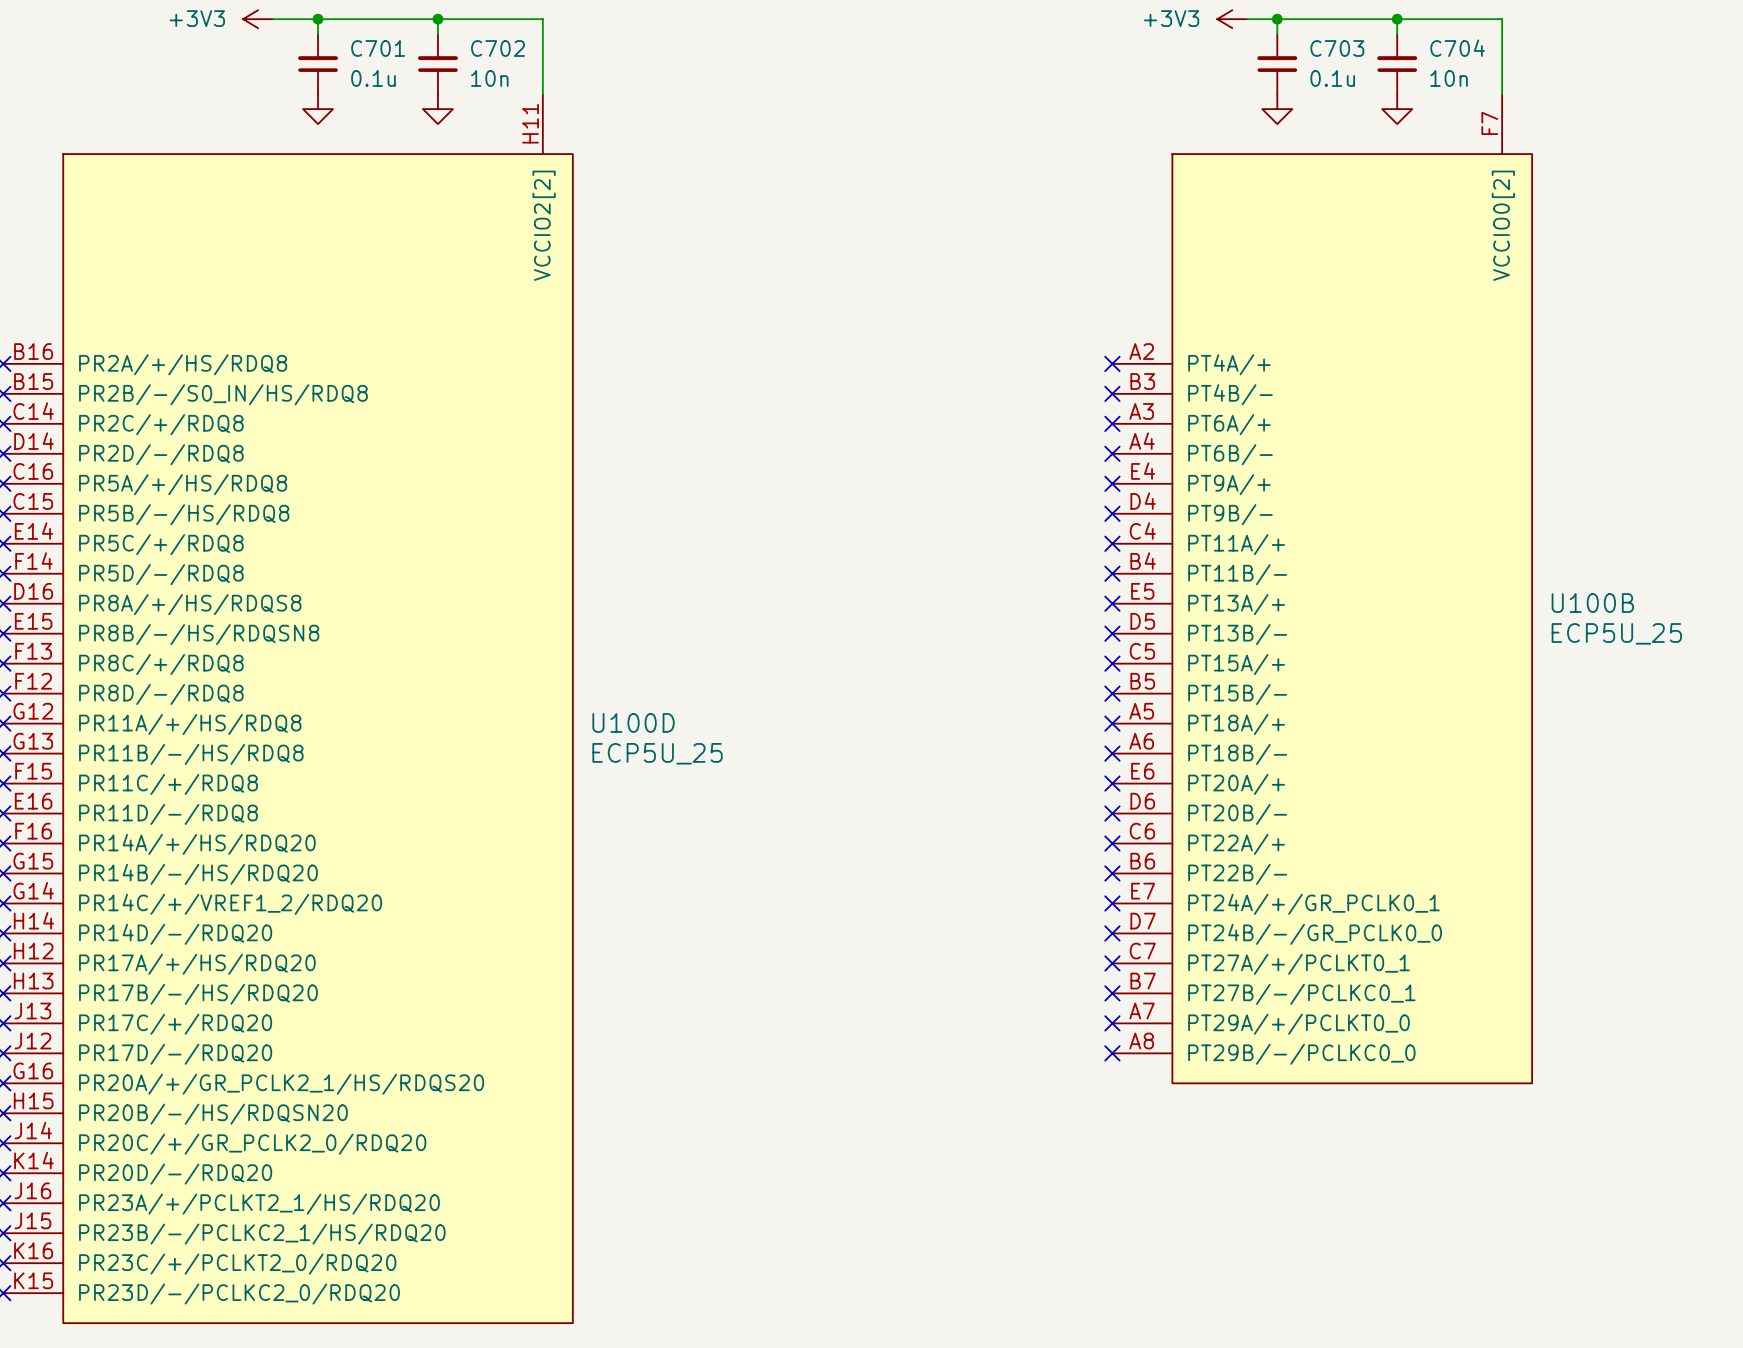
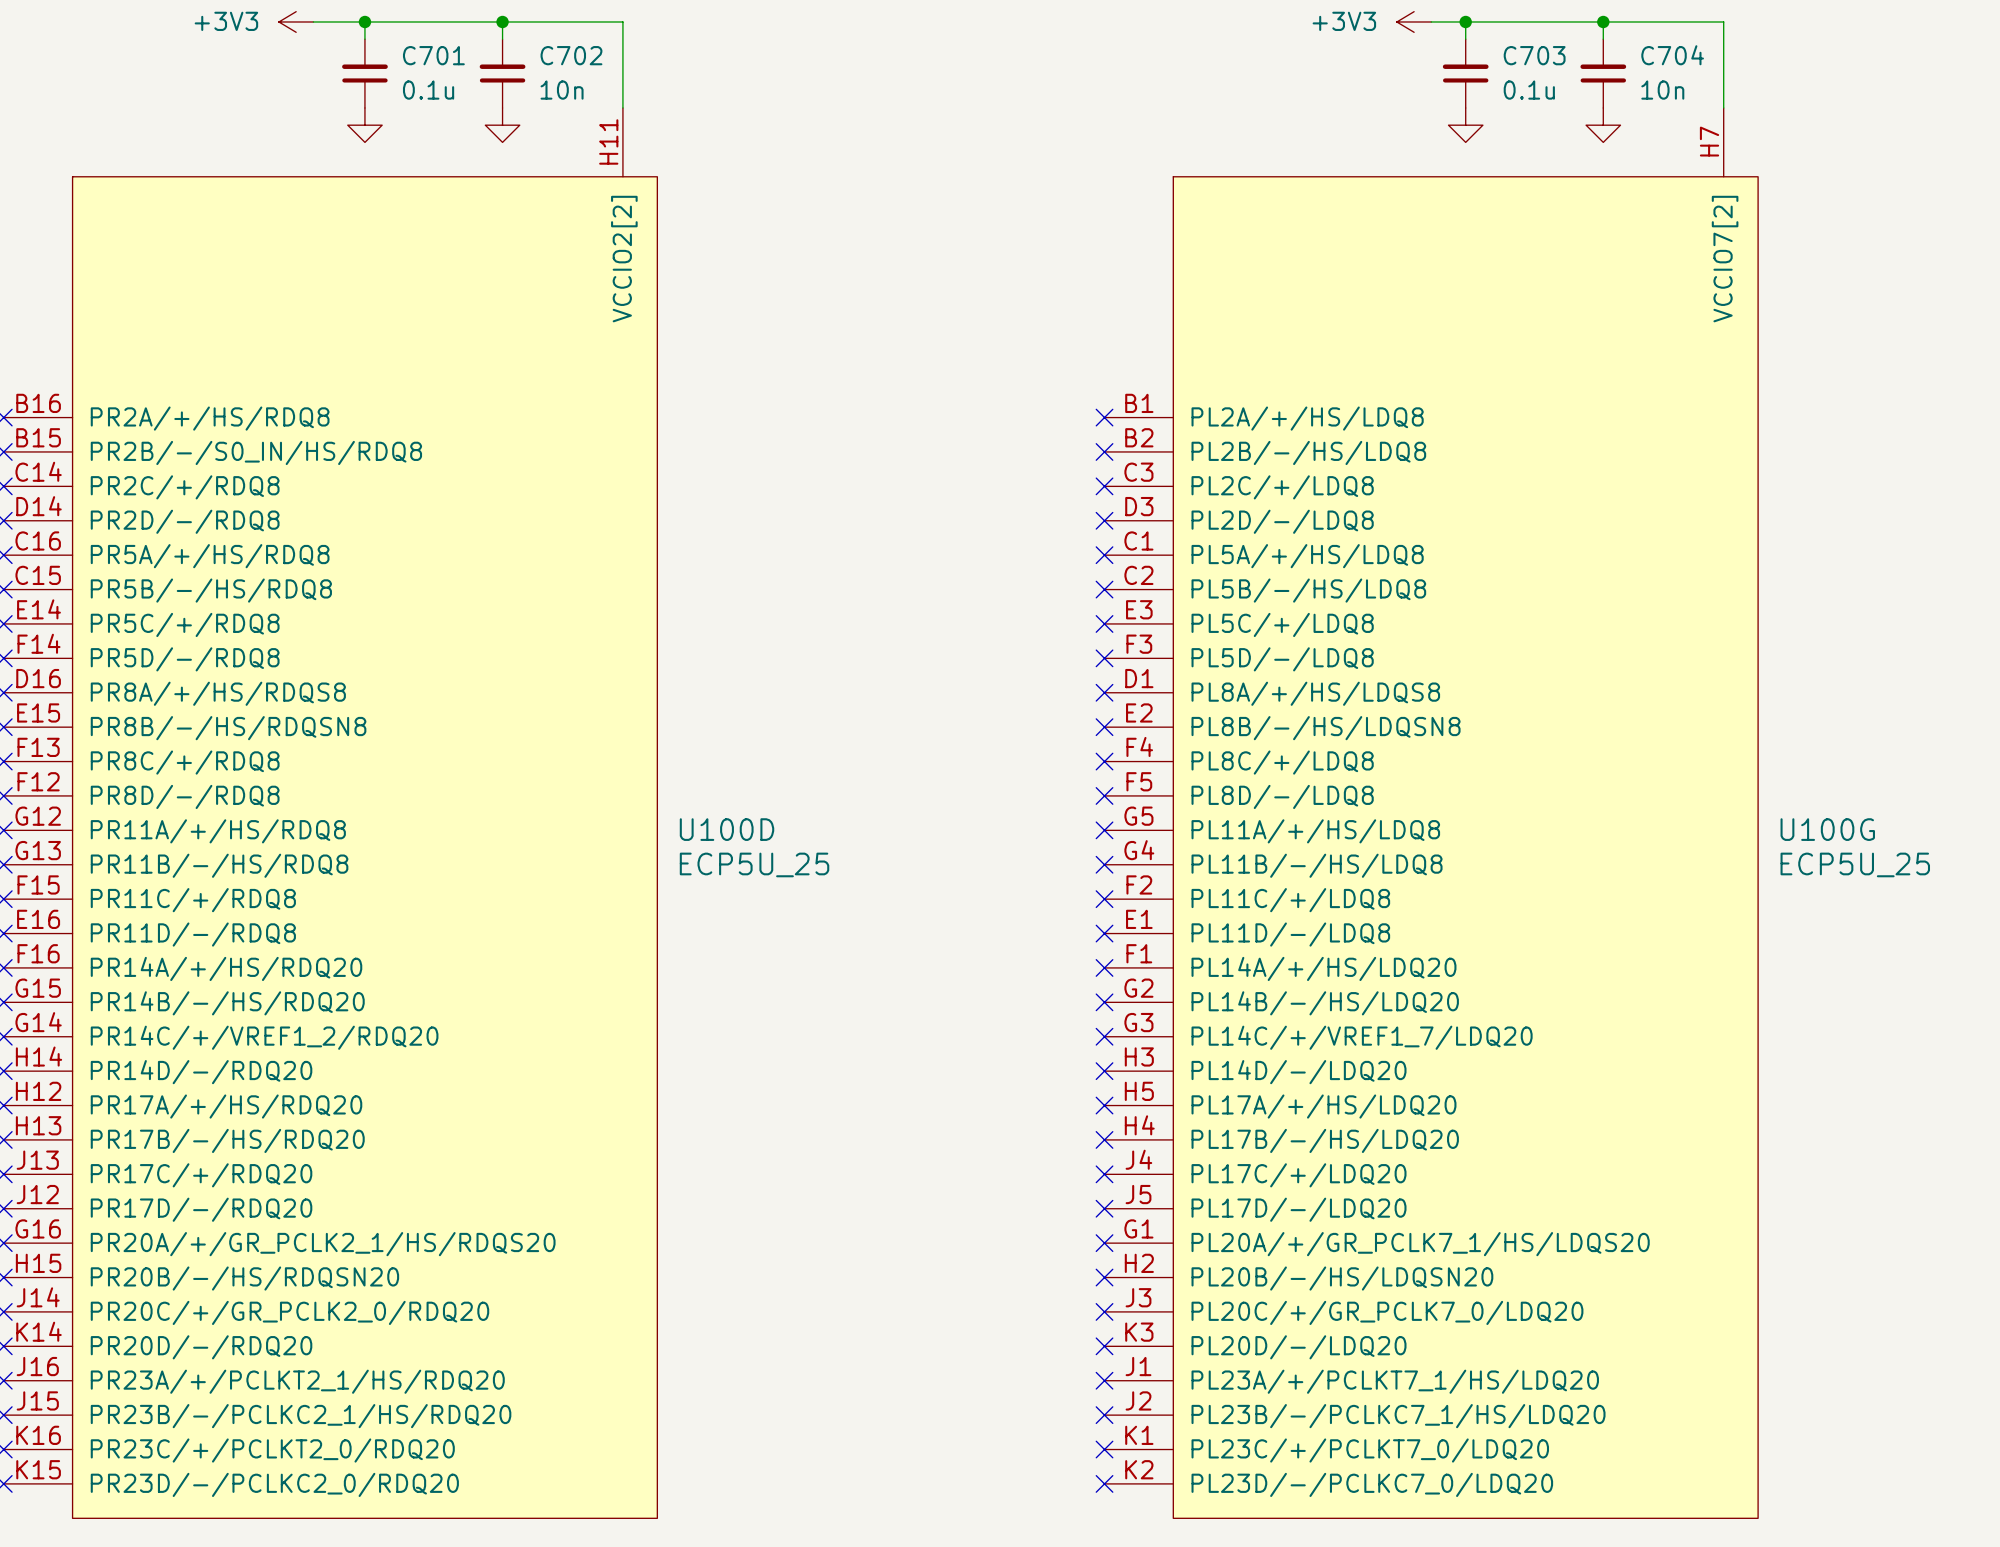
no-connect mark: none -> (1104, 417)
no-connect mark: (1112, 363) -> none
no-connect mark: none -> (1104, 451)
no-connect mark: (1112, 393) -> none
no-connect mark: none -> (1104, 486)
no-connect mark: (1112, 423) -> none
no-connect mark: none -> (1104, 520)
no-connect mark: (1112, 453) -> none
no-connect mark: none -> (1104, 555)
no-connect mark: (1112, 483) -> none
no-connect mark: none -> (1104, 589)
no-connect mark: (1112, 513) -> none
no-connect mark: none -> (1104, 623)
no-connect mark: (1112, 543) -> none
no-connect mark: none -> (1104, 658)
no-connect mark: (1112, 573) -> none
U100B: ECP5U_25 (1322, 588) -> none
no-connect mark: none -> (1104, 692)
no-connect mark: (1112, 603) -> none
no-connect mark: none -> (1104, 727)
no-connect mark: (1112, 633) -> none
no-connect mark: none -> (1104, 761)
no-connect mark: (1112, 663) -> none
no-connect mark: none -> (1104, 795)
no-connect mark: (1112, 693) -> none
U100G: none -> ECP5U_25 (1431, 813)
no-connect mark: none -> (1104, 830)
no-connect mark: (1112, 723) -> none
no-connect mark: none -> (1104, 864)
no-connect mark: (1112, 753) -> none
no-connect mark: none -> (1104, 899)
no-connect mark: (1112, 783) -> none
no-connect mark: none -> (1104, 933)
no-connect mark: (1112, 813) -> none
no-connect mark: none -> (1104, 967)
no-connect mark: (1112, 843) -> none
no-connect mark: none -> (1104, 1002)
no-connect mark: (1112, 873) -> none
no-connect mark: none -> (1104, 1036)
no-connect mark: (1112, 903) -> none
no-connect mark: none -> (1104, 1071)
no-connect mark: (1112, 933) -> none
no-connect mark: none -> (1104, 1105)
no-connect mark: (1112, 963) -> none
no-connect mark: none -> (1104, 1139)
no-connect mark: (1112, 993) -> none
no-connect mark: none -> (1104, 1174)
no-connect mark: (1112, 1023) -> none
no-connect mark: none -> (1104, 1208)
no-connect mark: (1112, 1053) -> none
no-connect mark: none -> (1104, 1243)
no-connect mark: none -> (1104, 1277)
no-connect mark: none -> (1104, 1311)
no-connect mark: none -> (1104, 1346)
no-connect mark: none -> (1104, 1380)
no-connect mark: none -> (1104, 1415)
no-connect mark: none -> (1104, 1449)
no-connect mark: none -> (1104, 1483)

